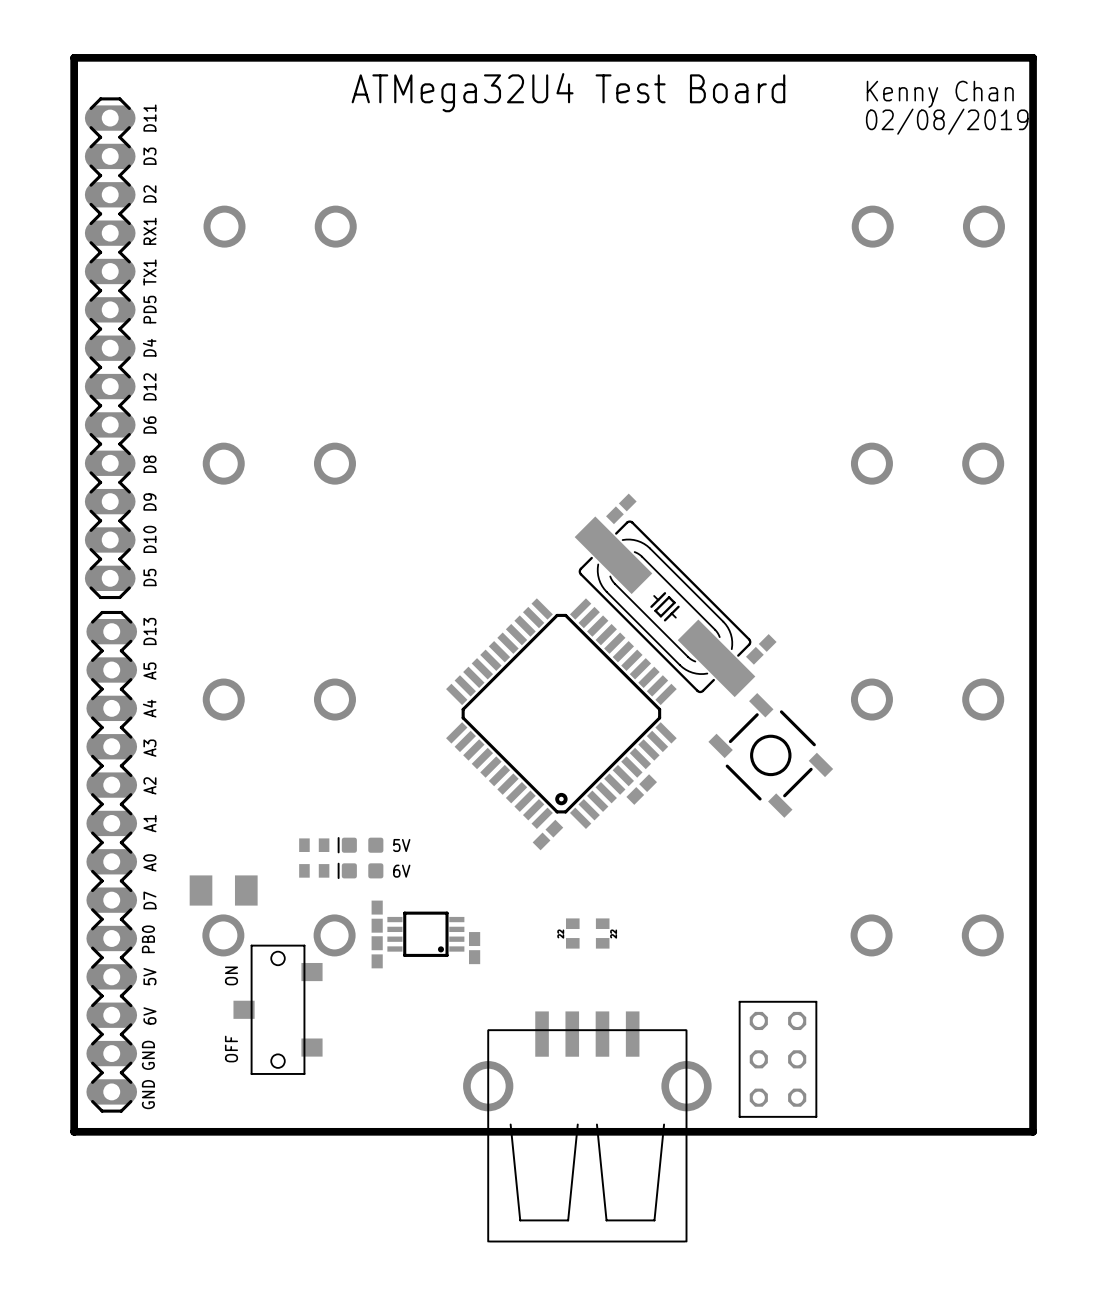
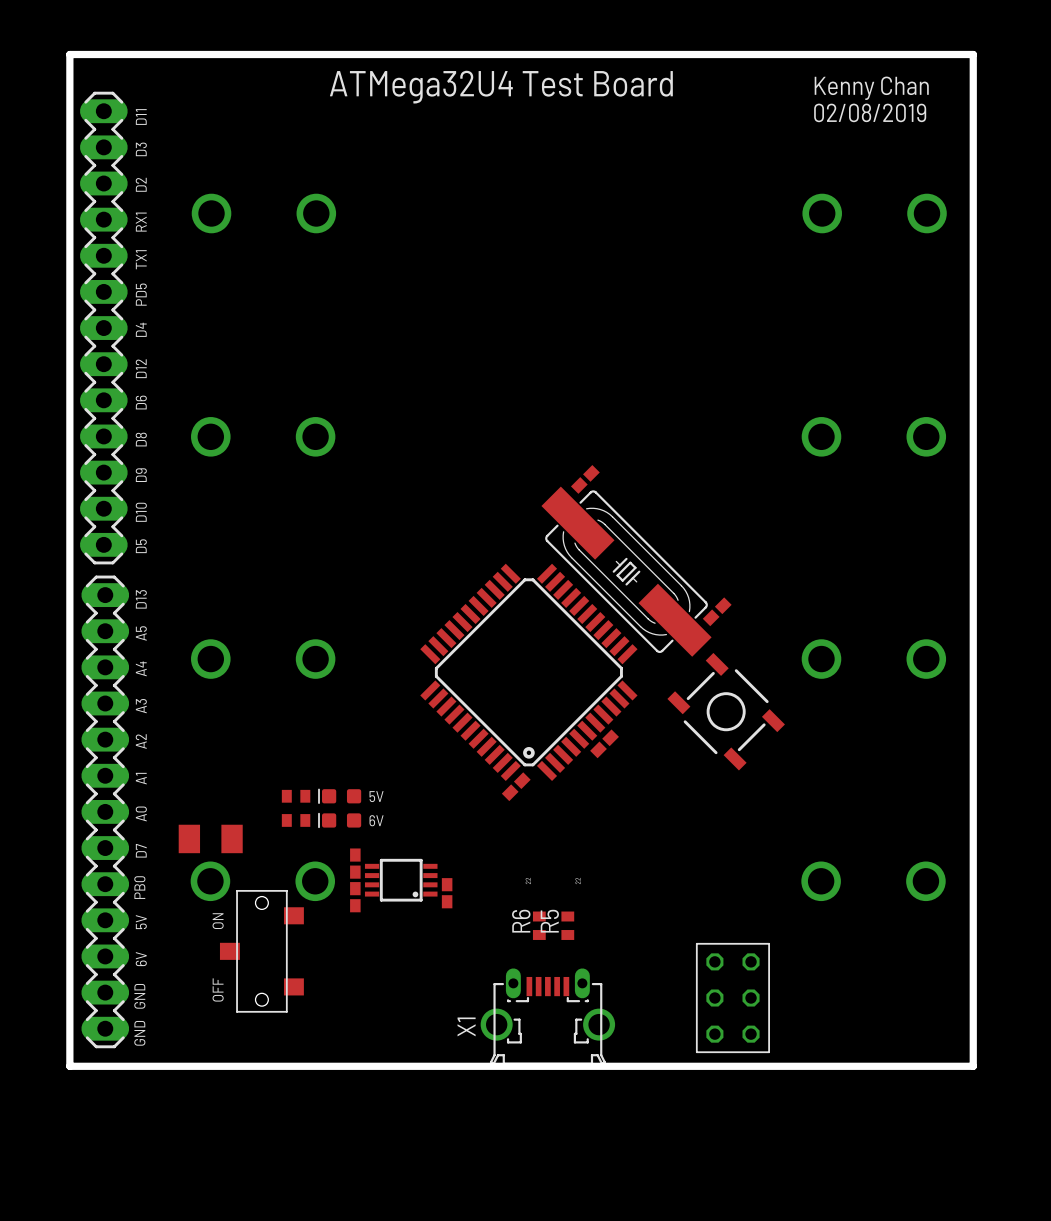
part: (572, 933) -> none
part: (602, 933) -> none
R6: none -> (539, 925)
R5: none -> (567, 925)
X1: none -> (547, 1016)
part: (587, 1126) -> none

